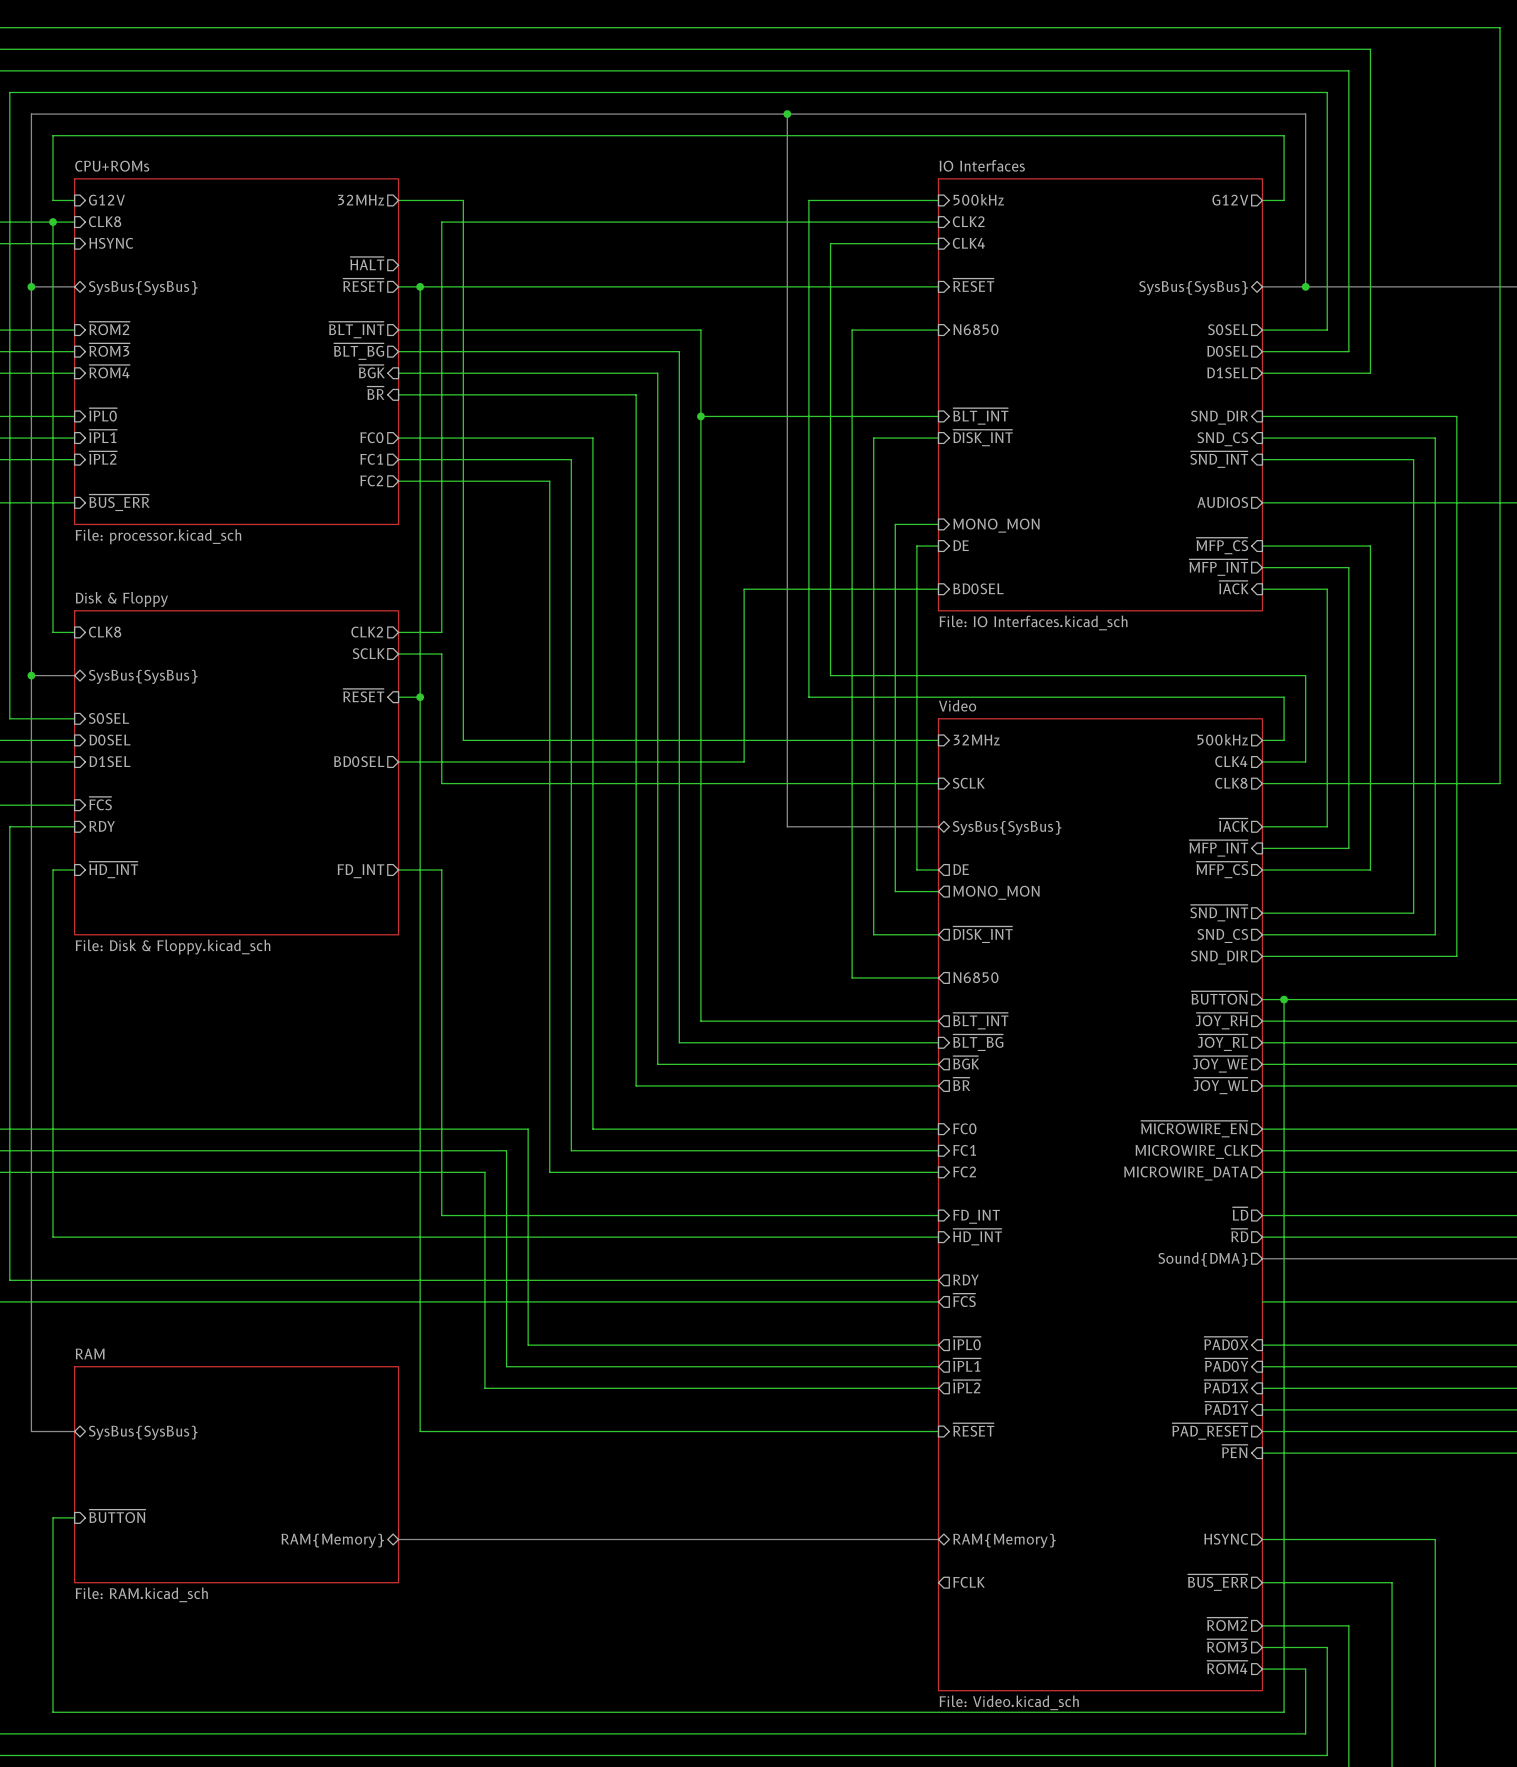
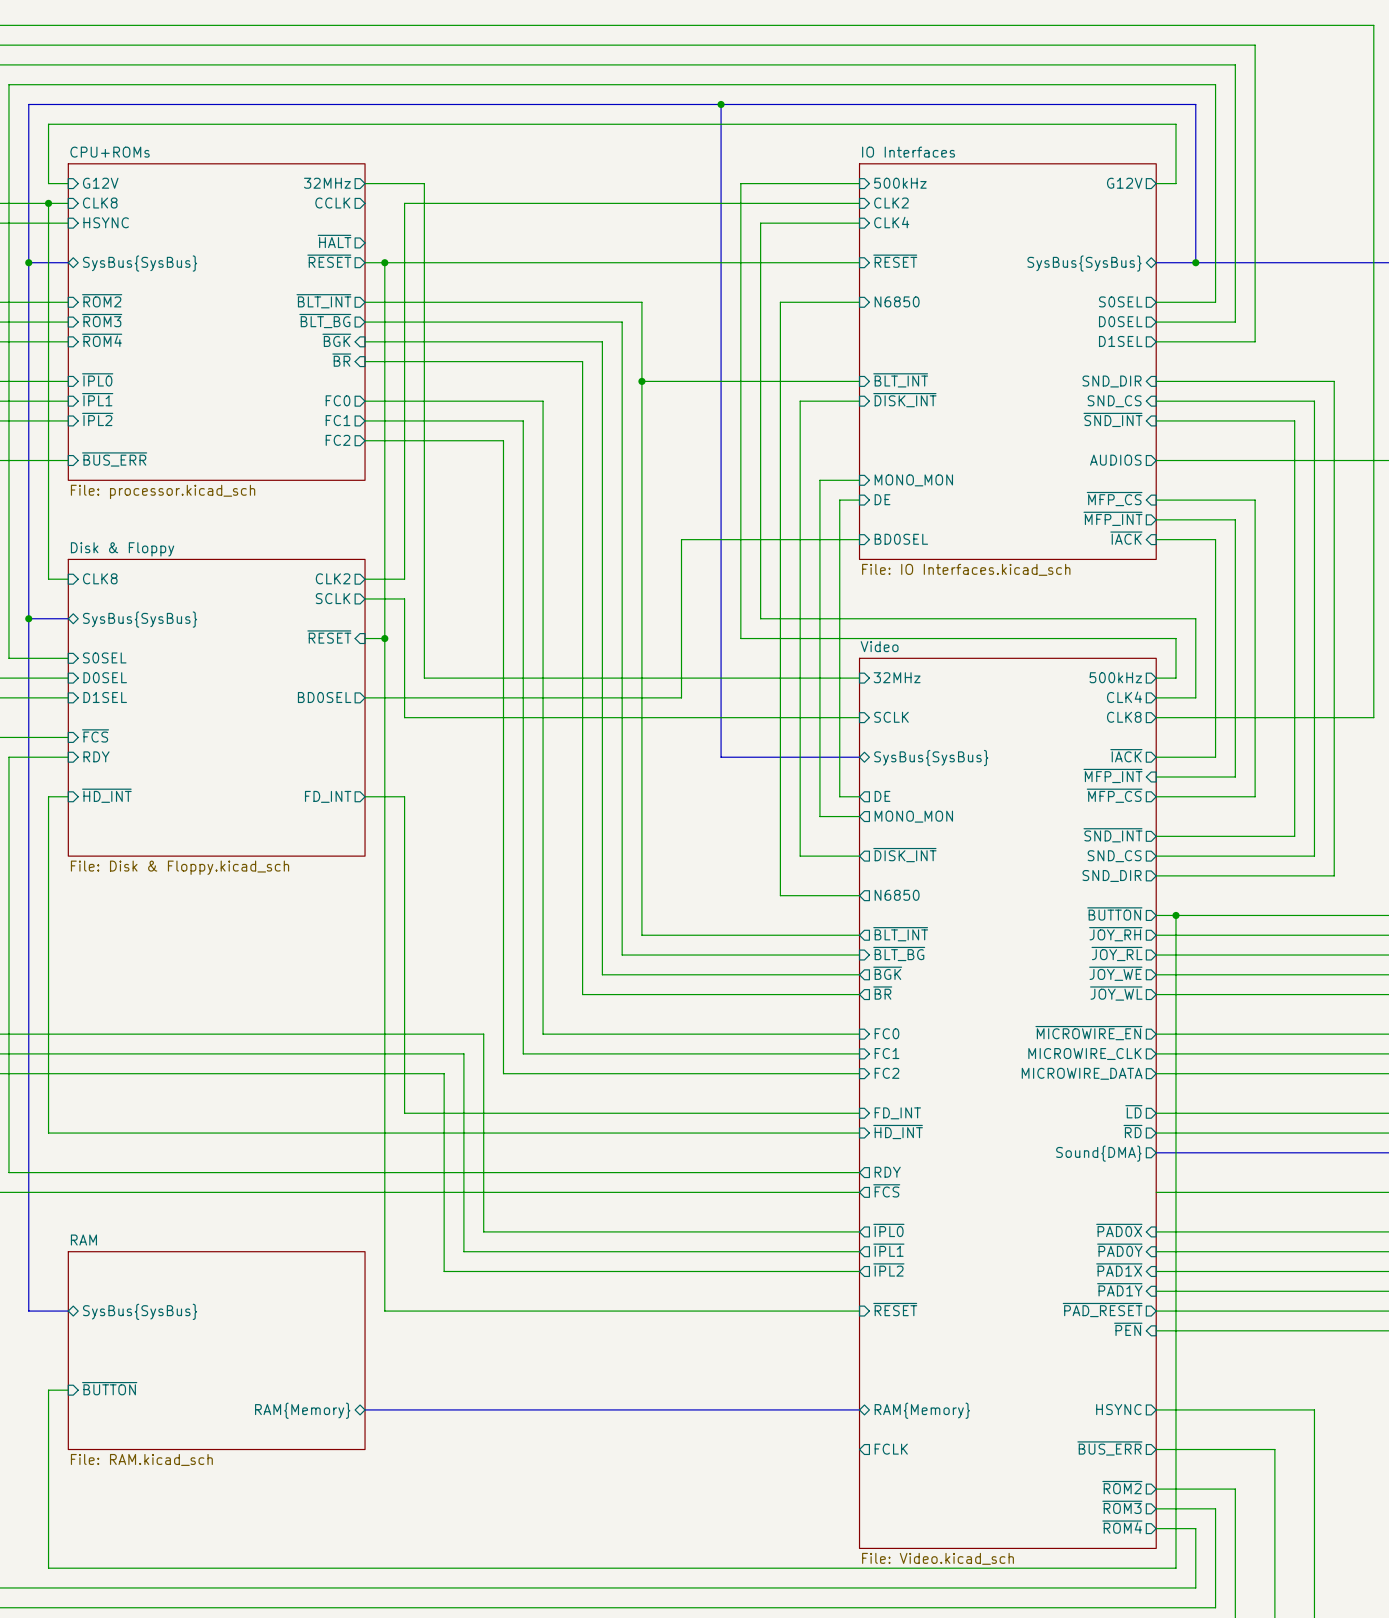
sheet pin: none -> CCLK (332, 203)

